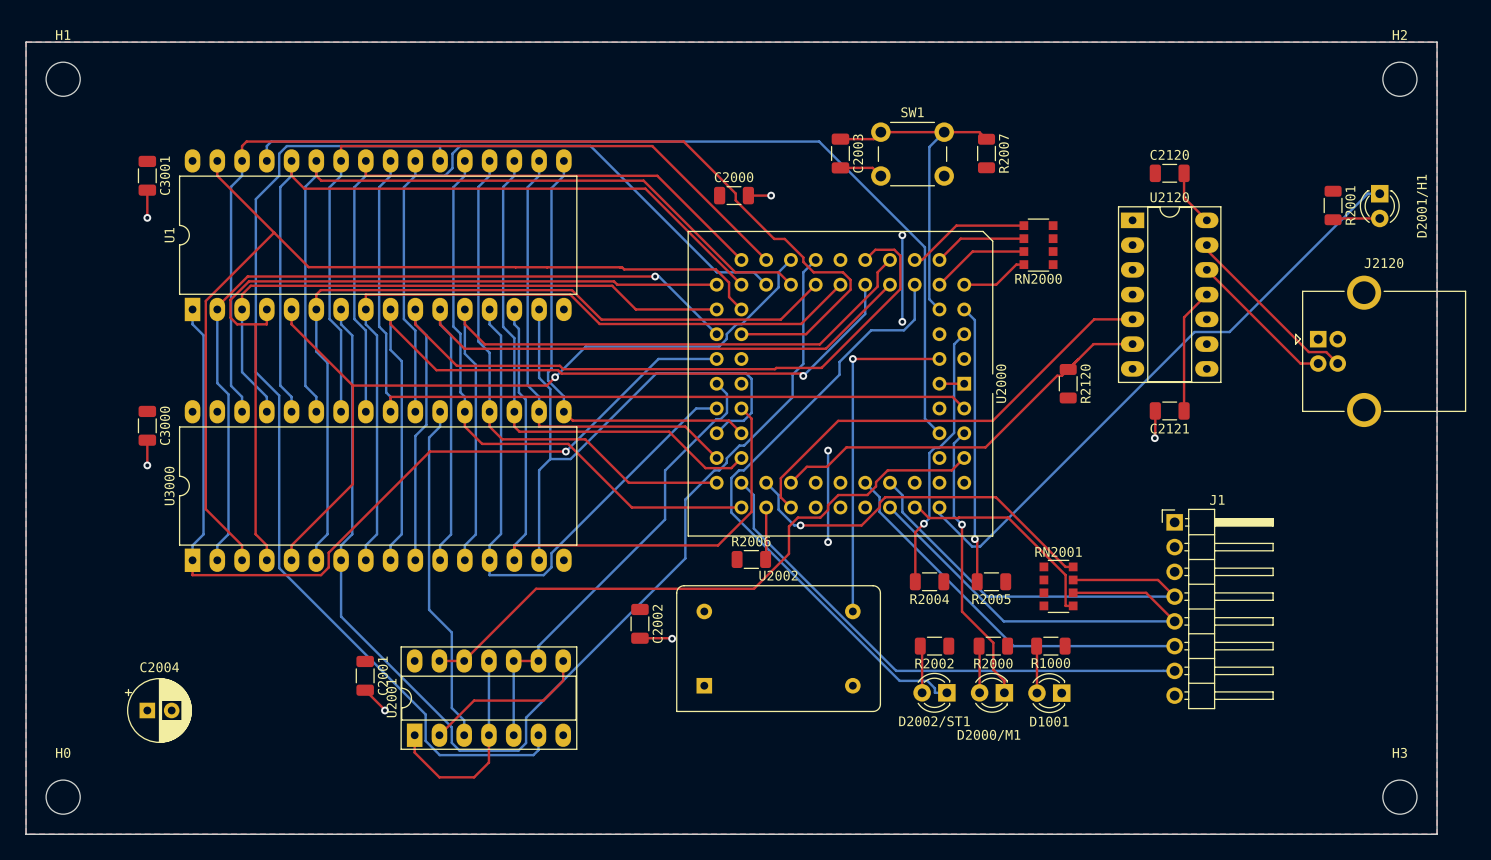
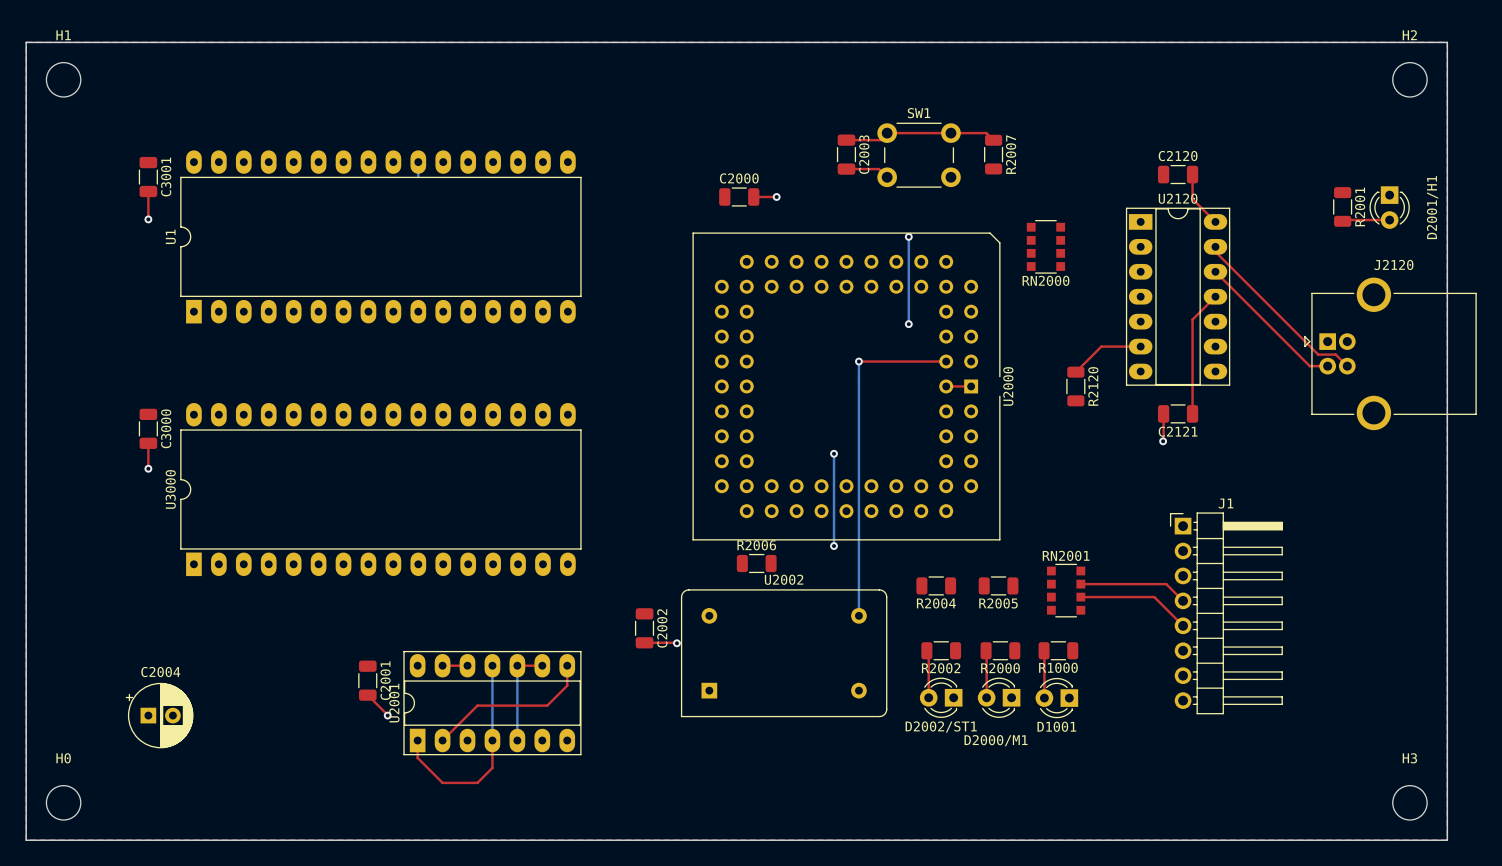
bottom track: (944, 132) (929, 147) (929, 299) (939, 309) -> none
top track: (217, 160) (217, 175) (308, 267) (515, 267) -> none
bottom track: (242, 160) (242, 175) (231, 186) (231, 385) (242, 396) (242, 411) -> none
top track: (242, 160) (242, 146) (246, 141) (683, 141) (735, 193) (735, 200) (774, 238) (784, 238) (803, 257) (803, 261) (813, 272) (842, 272) (850, 279) (850, 289) (806, 334) (741, 334) -> none
bottom track: (266, 160) (266, 146) (271, 141) (819, 141) (924, 247) (924, 418) (939, 433) -> none
bottom track: (291, 160) (291, 175) (280, 187) (280, 385) (291, 396) (291, 411) -> none
top track: (291, 160) (291, 175) (304, 188) (645, 188) (741, 284) -> none
bottom track: (316, 160) (316, 175) (305, 186) (305, 385) (316, 396) (316, 411) -> none
top track: (316, 160) (316, 175) (321, 180) (643, 180) (735, 272) (778, 272) (790, 284) -> none
bottom track: (341, 160) (341, 175) (329, 187) (329, 319) (341, 330) (341, 411) -> none
top track: (341, 160) (341, 146) (652, 146) (766, 259) -> none
bottom track: (365, 160) (365, 175) (354, 187) (354, 319) (365, 330) (365, 411) -> none
top track: (365, 160) (365, 175) (657, 175) (741, 259) -> none
bottom track: (390, 160) (390, 175) (379, 187) (379, 326) (386, 333) (386, 392) (390, 396) (390, 411) -> none
bottom track: (440, 160) (440, 146) (286, 146) (279, 153) (279, 175) (255, 199) (255, 372) (279, 395) (279, 568) (425, 714) (425, 740) (439, 755) (533, 755) (538, 750) (538, 735) -> none
bottom track: (464, 160) (464, 175) (453, 187) (453, 326) (460, 333) (460, 392) (464, 396) (464, 411) -> none
bottom track: (489, 160) (489, 175) (478, 187) (478, 341) (489, 352) (489, 411) -> none
bottom track: (514, 160) (514, 175) (503, 187) (503, 326) (514, 338) (514, 411) -> none
bottom track: (539, 160) (539, 175) (527, 187) (527, 385) (539, 396) (539, 411) -> none
bottom track: (563, 160) (563, 175) (551, 188) (551, 368) (548, 372) (548, 380) (563, 396) (563, 411) -> none
bottom track: (1379, 193) (1367, 193) (1229, 332) (1194, 332) (980, 546) (972, 546) (939, 513) (939, 507) -> none
top track: (1023, 225) (956, 225) (922, 259) (914, 259) -> none
top track: (274, 232) (205, 300) (205, 509) (242, 545) (242, 560) -> none
top track: (1023, 238) (960, 238) (939, 259) -> none
top track: (1023, 251) (972, 251) (939, 284) -> none
bottom track: (790, 259) (778, 272) (778, 287) (741, 324) (736, 324) (726, 334) (726, 338) (719, 346) (585, 346) (555, 377) -> none
bottom track: (815, 259) (803, 272) (803, 363) (792, 374) (792, 397) (744, 445) (739, 445) (726, 458) (726, 462) (719, 470) (714, 470) (685, 499) (685, 558) (526, 717) (526, 743) (518, 750) (459, 750) (451, 742) (451, 727) (341, 616) (341, 545) (352, 534) (352, 335) (341, 324) (341, 309) -> none
top track: (865, 259) (875, 249) (894, 249) (900, 255) (900, 289) (821, 367) (563, 369) (559, 365) (456, 365) (415, 324) (415, 309) -> none
top track: (889, 259) (877, 272) (877, 286) (819, 344) (484, 344) (464, 324) (464, 309) -> none
top track: (1023, 264) (1016, 264) (996, 284) (964, 284) -> none
top track: (515, 267) (547, 267) -> none
top track: (547, 267) (715, 269) (729, 282) (729, 297) (741, 309) -> none
bottom track: (655, 276) (658, 276) (716, 334) -> none
top track: (655, 276) (247, 276) (217, 306) (217, 309) -> none
via: (655, 276) -> none
top track: (716, 284) (617, 284) (614, 281) (249, 281) (230, 299) (230, 317) (237, 324) (266, 324) (266, 309) -> none
bottom track: (766, 284) (753, 272) (716, 272) (590, 145) (460, 145) (452, 153) (452, 168) (444, 175) (415, 175) (403, 187) (403, 319) (415, 330) (415, 411) -> none
top track: (815, 284) (780, 319) (601, 319) (572, 290) (320, 290) (316, 294) (316, 309) -> none
top track: (840, 284) (801, 323) (599, 323) (570, 294) (365, 294) (365, 309) -> none
bottom track: (865, 284) (865, 314) (803, 375) -> none
top track: (889, 284) (825, 348) (464, 348) (440, 324) (440, 309) -> none
bottom track: (914, 284) (914, 319) (903, 330) (871, 330) (839, 361) (839, 374) (743, 470) (739, 470) (731, 478) (731, 512) (899, 680) (927, 680) (934, 688) (934, 692) (946, 692) -> none
bottom track: (192, 309) (192, 324) (203, 335) (203, 534) (192, 545) (192, 560) -> none
bottom track: (217, 309) (217, 383) (228, 394) (228, 534) (217, 545) (217, 560) -> none
bottom track: (242, 309) (242, 372) (266, 396) (266, 411) -> none
top track: (242, 309) (242, 294) (250, 285) (612, 285) (635, 309) (716, 309) -> none
top track: (291, 309) (291, 324) (352, 385) -> none
bottom track: (316, 309) (316, 351) (327, 362) (327, 534) (316, 545) (316, 560) -> none
bottom track: (365, 309) (365, 324) (377, 335) (377, 534) (365, 545) (365, 560) -> none
bottom track: (390, 309) (390, 349) (401, 361) (401, 534) (390, 545) (390, 560) -> none
top track: (390, 309) (390, 324) (436, 370) (558, 370) (561, 373) (800, 373) (803, 375) -> none
bottom track: (415, 309) (415, 324) (426, 335) (426, 424) (415, 435) (415, 560) -> none
bottom track: (440, 309) (440, 324) (451, 335) (451, 534) (440, 545) (440, 560) -> none
bottom track: (464, 309) (464, 353) (475, 364) (475, 534) (464, 545) (464, 560) -> none
bottom track: (489, 309) (489, 324) (501, 335) (501, 533) (489, 545) (489, 575) (543, 575) (551, 567) (551, 553) (696, 408) (716, 408) -> none
bottom track: (514, 309) (514, 324) (518, 328) (518, 392) (525, 399) (525, 533) (514, 545) (514, 560) -> none
bottom track: (539, 309) (539, 377) (550, 389) (550, 459) -> none
bottom track: (964, 309) (974, 320) (974, 539) -> none
top track: (1132, 319) (1094, 319) (992, 420) (838, 420) (780, 478) (780, 497) (790, 507) -> none
top track: (255, 324) (255, 534) (266, 545) (266, 560) -> none
bottom track: (964, 334) (954, 344) (954, 432) (939, 447) (934, 447) (929, 453) (929, 518) (923, 523) -> none
top track: (1093, 344) (1061, 375) (1057, 375) (985, 447) (846, 447) (827, 466) (806, 466) (790, 482) -> (1101, 346) (1086, 361)
bottom track: (716, 358) (658, 358) (565, 451) -> none
via: (803, 375) -> none
top track: (555, 377) (546, 385) (352, 385) -> none
via: (555, 377) -> none
bottom track: (716, 383) (726, 394) (726, 412) (720, 419) (716, 419) (665, 470) (665, 519) (538, 646) (538, 660) -> none
top track: (352, 385) (352, 484) (291, 545) (291, 560) -> none
top track: (741, 408) (751, 418) (751, 511) (718, 545) (514, 545) (514, 560) -> none
top track: (964, 408) (952, 396) (390, 396) (390, 411) -> none
bottom track: (440, 411) (440, 426) (429, 437) (429, 609) (451, 632) (451, 708) (464, 720) (464, 735) -> none
top track: (464, 411) (464, 426) (482, 443) (568, 443) (631, 507) (741, 507) -> none
top track: (489, 411) (489, 426) (502, 439) (585, 439) (628, 482) (716, 482) -> none
top track: (514, 411) (514, 426) (519, 431) (669, 431) (705, 468) (731, 468) (741, 457) -> none
top track: (539, 411) (539, 426) (685, 426) (716, 457) -> none
top track: (563, 411) (572, 420) (728, 420) (741, 433) -> none
bottom track: (716, 433) (729, 420) (743, 420) (751, 412) (751, 378) (745, 373) (656, 373) (570, 459) (550, 459) -> none
bottom track: (964, 433) (953, 443) (953, 516) (962, 524) -> none
top track: (565, 451) (429, 451) (328, 552) (328, 567) (321, 575) (192, 575) (192, 560) -> none
via: (565, 451) -> none
top track: (964, 457) (951, 470) (887, 470) (876, 482) (876, 486) (867, 495) (838, 495) (828, 505) (828, 509) (820, 517) (797, 517) (788, 526) (788, 553) (754, 588) (536, 588) (463, 660) -> none
bottom track: (550, 459) (539, 470) (539, 560) -> none
bottom track: (741, 482) (753, 495) (753, 528) (896, 670) (1174, 670) -> none
bottom track: (766, 482) (778, 495) (778, 509) (794, 525) (800, 525) -> none
bottom track: (865, 482) (879, 497) (879, 511) (1013, 646) (1174, 646) -> none
bottom track: (889, 482) (902, 495) (902, 512) (986, 596) (1174, 596) -> none
top track: (766, 507) (765, 559) -> none
bottom track: (889, 507) (1003, 621) (1174, 621) -> none
top track: (914, 507) (918, 507) (928, 518) (1008, 517) (1065, 575) (1065, 605) (1073, 605) -> none
top track: (923, 523) (915, 532) (915, 581) -> none
via: (923, 523) -> none
top track: (962, 524) (962, 611) (993, 642) (993, 669) (1004, 680) (1004, 692) -> none
via: (962, 524) -> none
top track: (800, 525) (861, 525) (879, 507) (879, 502) (885, 497) (995, 497) (1065, 566) (1073, 566) -> none
via: (800, 525) -> none
top track: (974, 539) (977, 541) (977, 581) -> none
via: (974, 539) -> none

